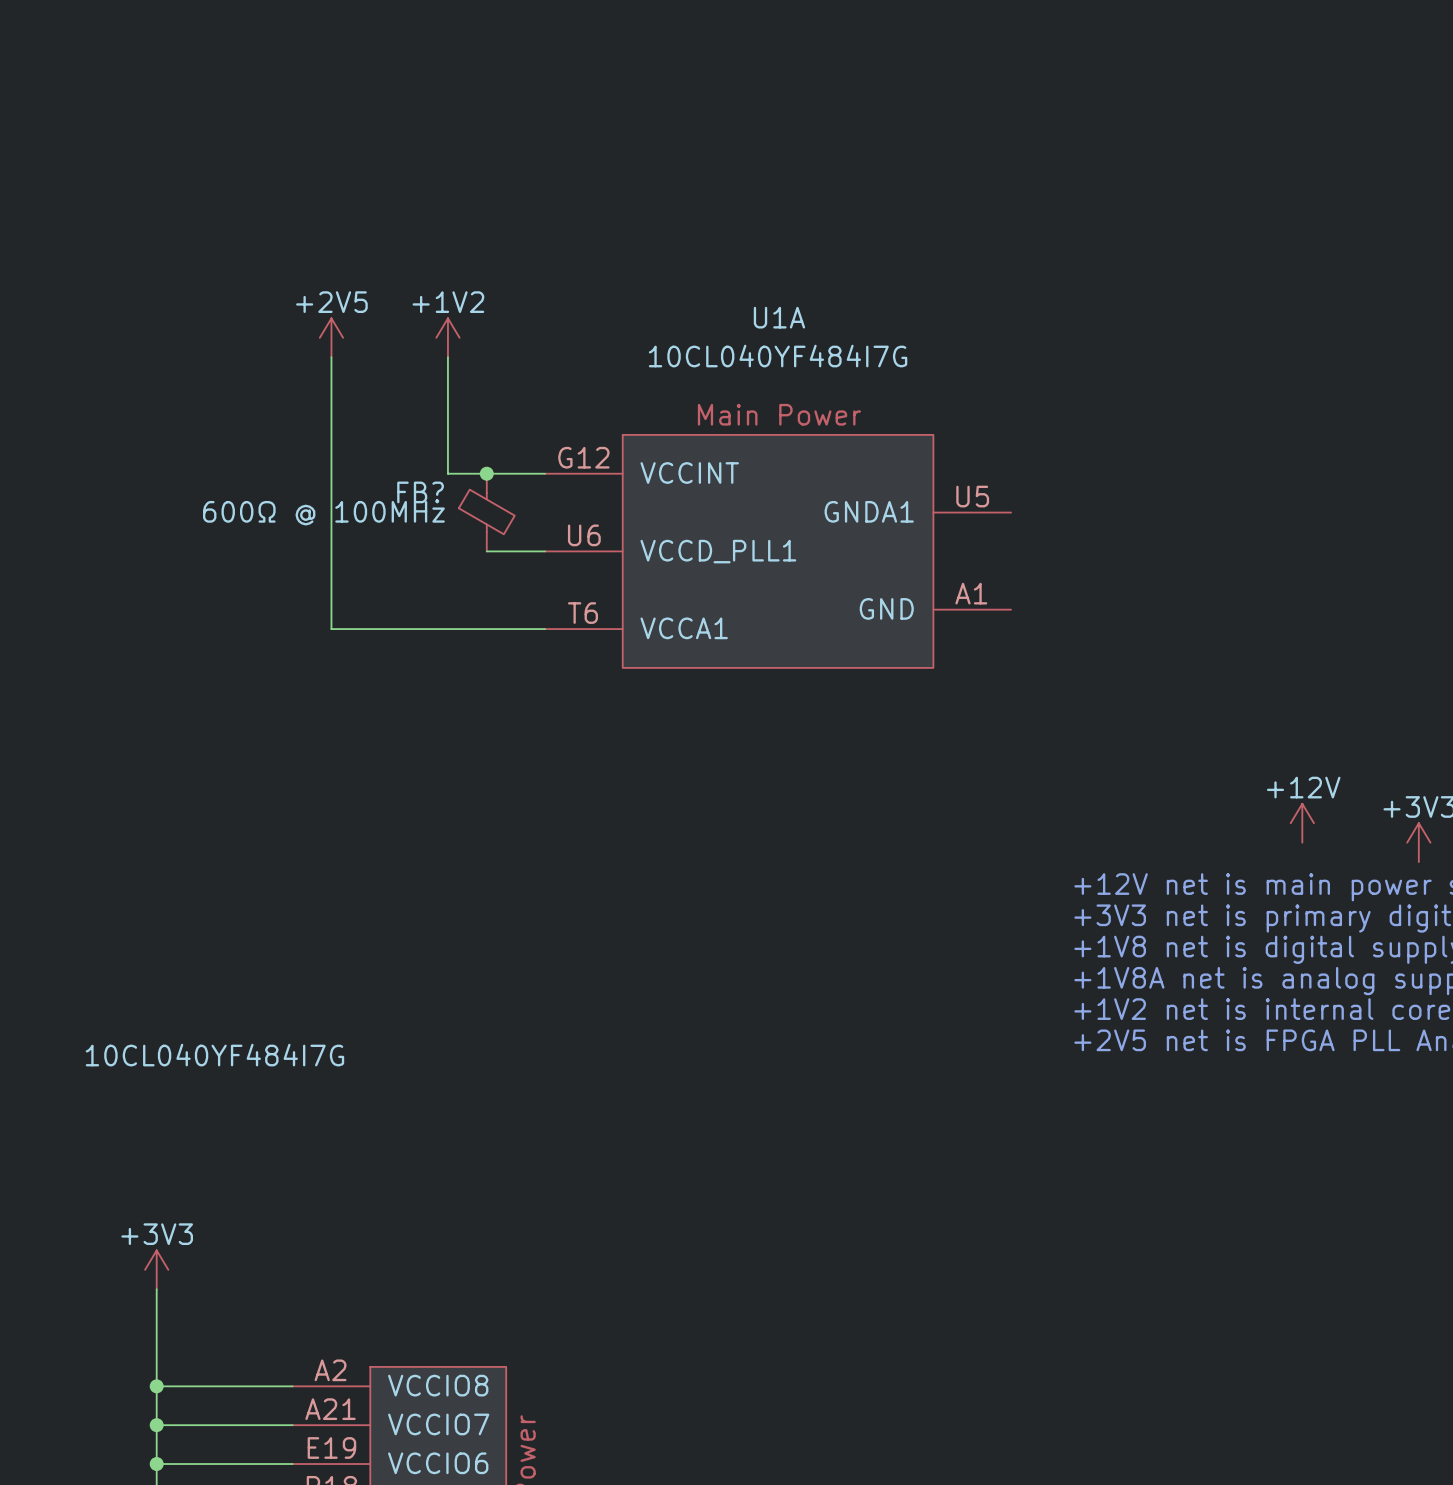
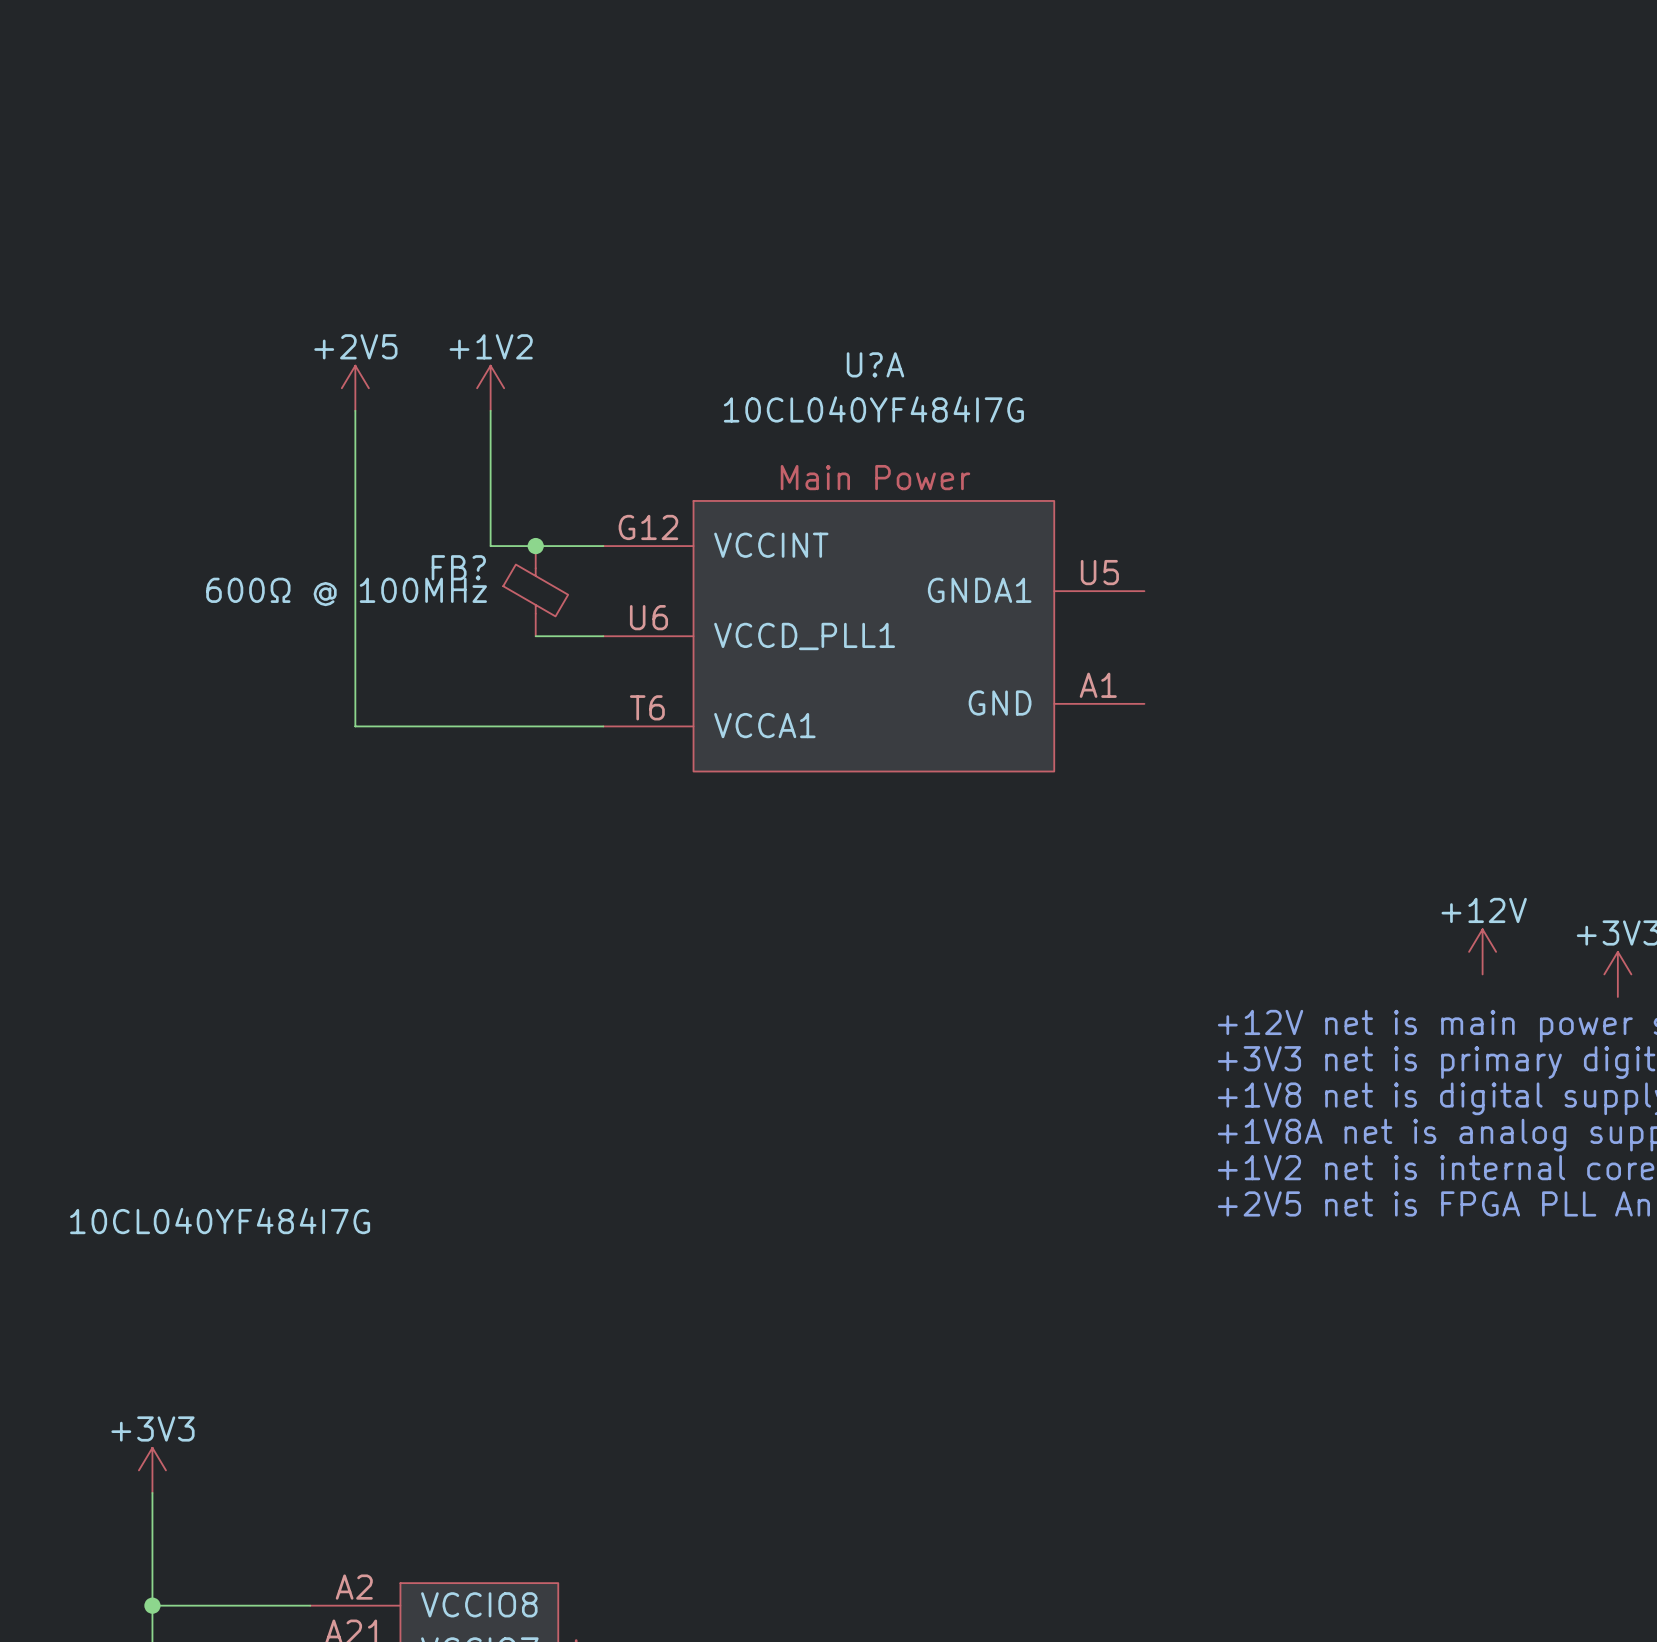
U1A name: U1A (779, 317) -> U?A (875, 364)

